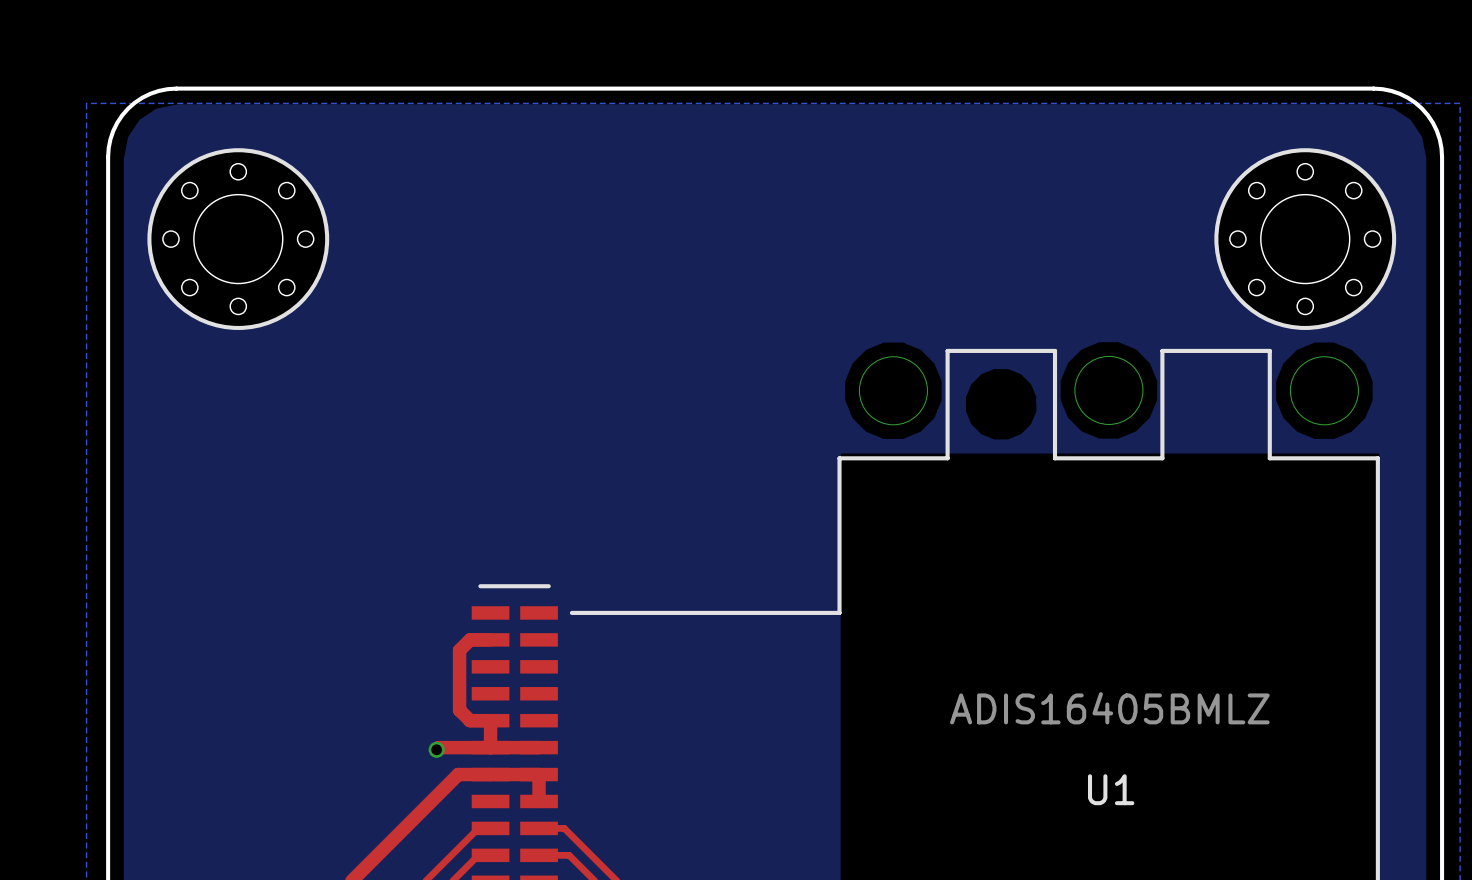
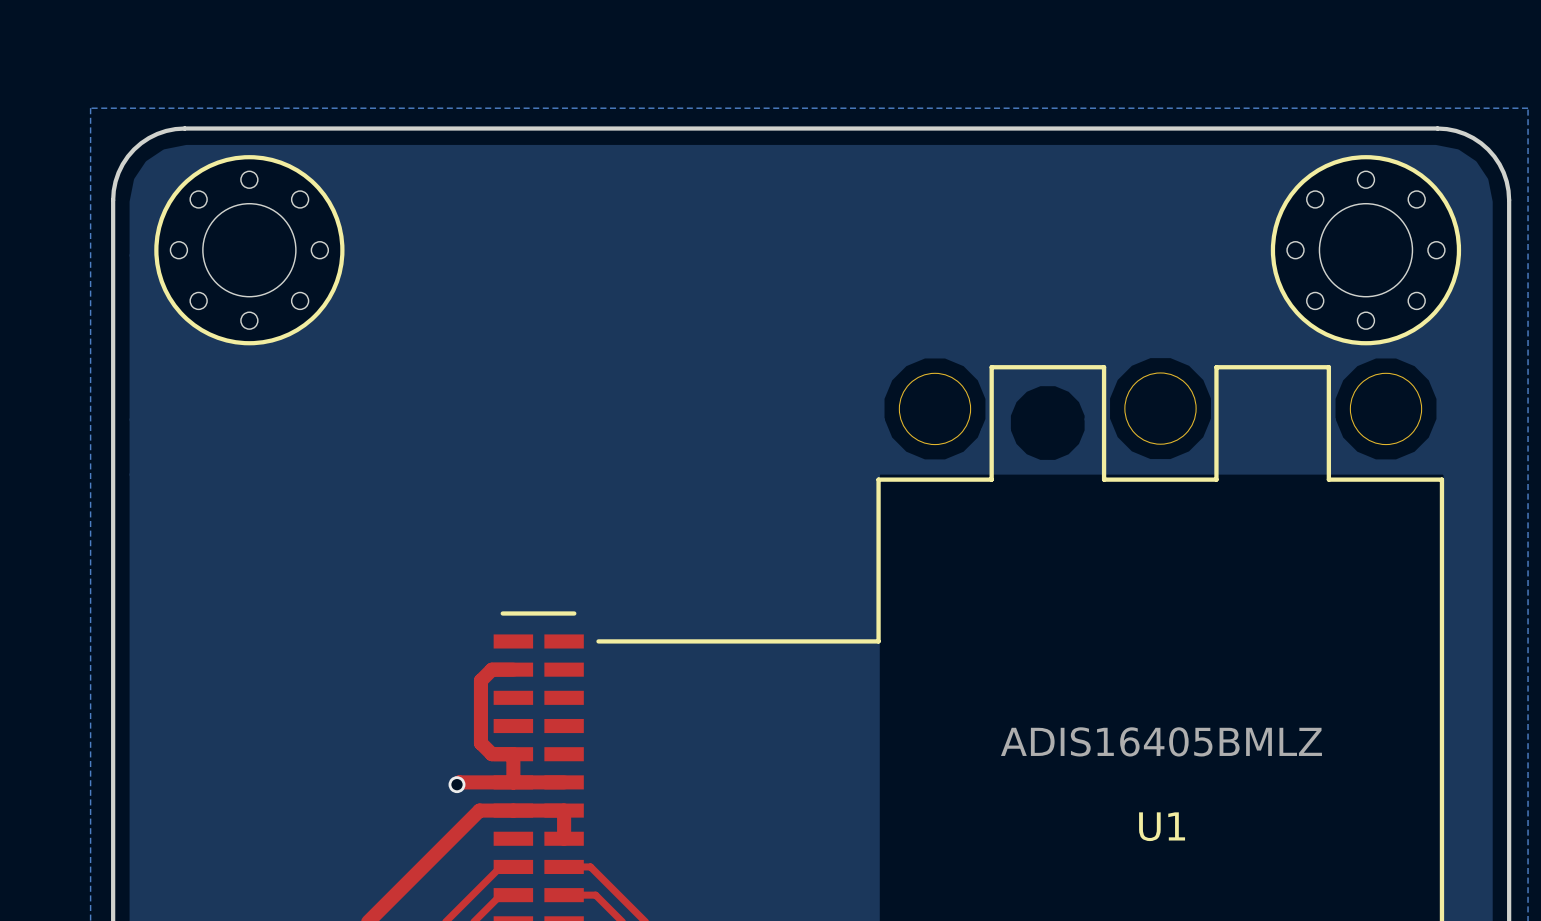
board edge: (108, 191) (108, 148) (117, 122) (128, 108) (142, 97) (158, 90) (176, 88) (1382, 89) (1399, 93) (1415, 102) (1432, 122) (1441, 148) (1442, 191) -> (113, 200) (118, 172) (134, 149) (157, 133) (184, 128) (1437, 128) (1464, 133) (1488, 149) (1503, 172) (1509, 200)

